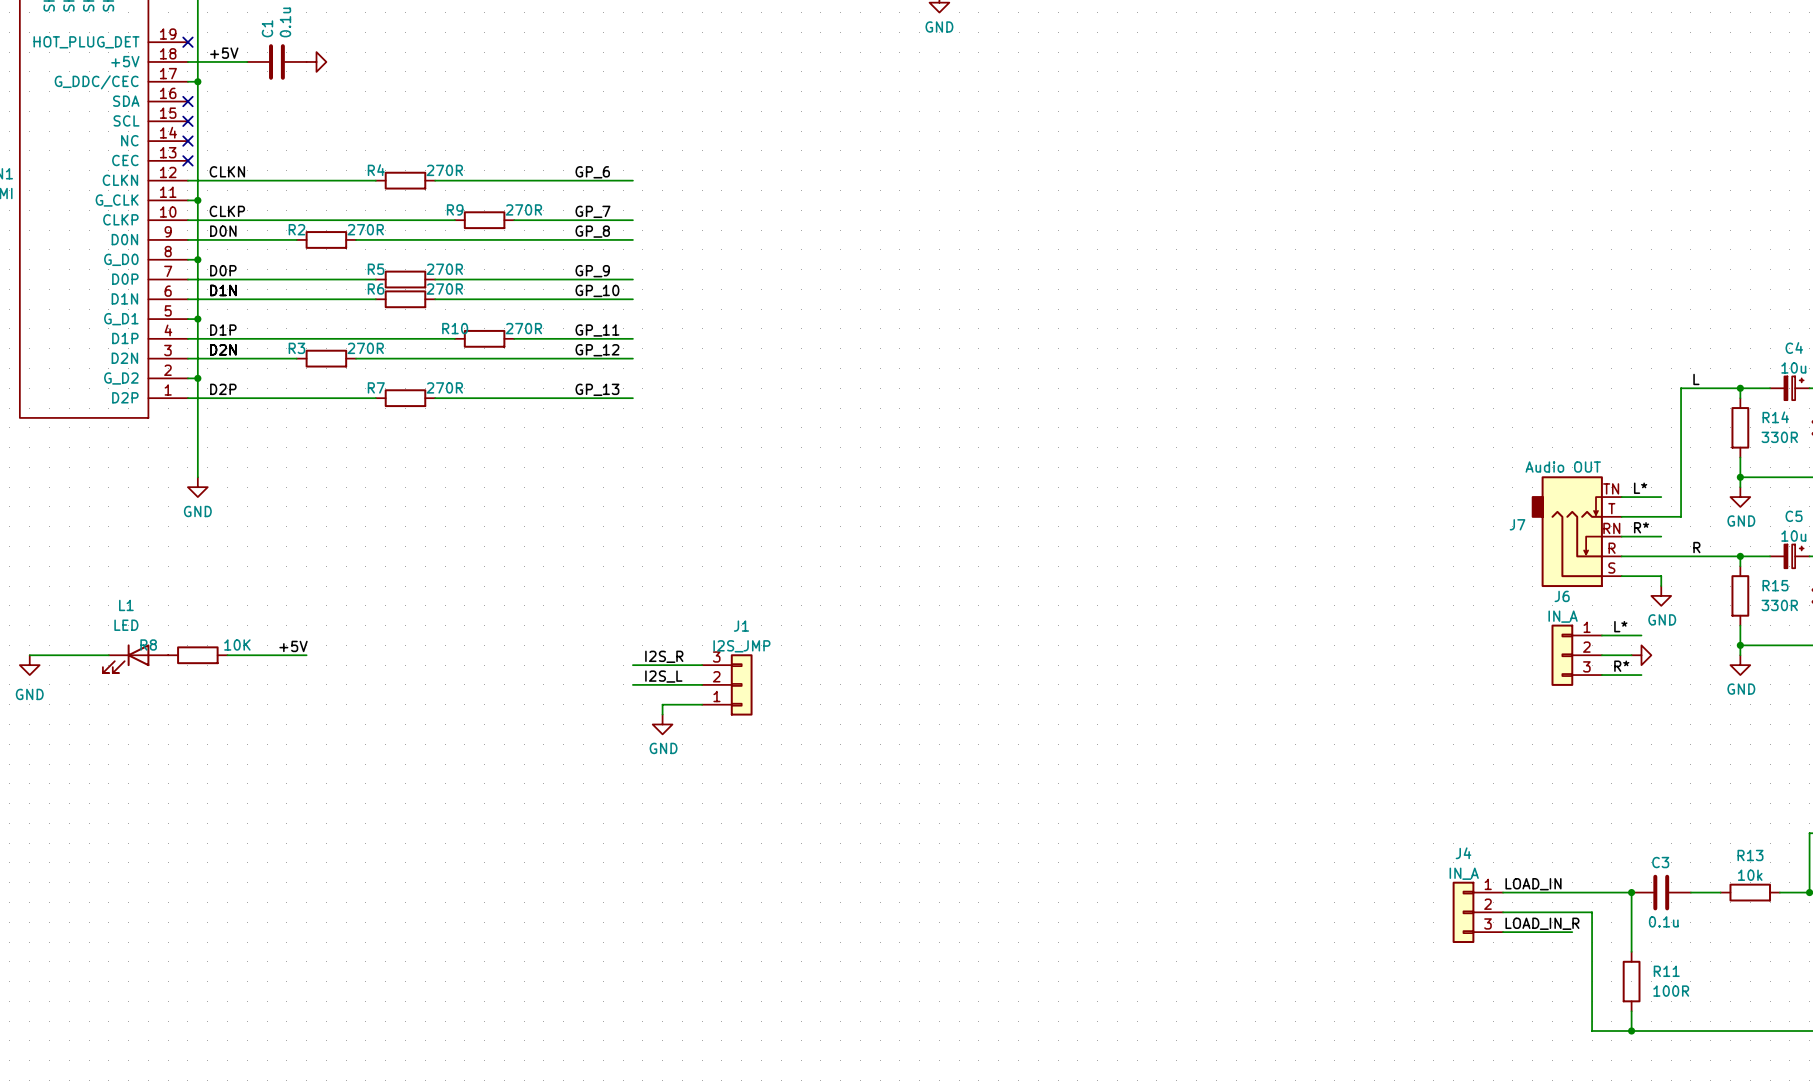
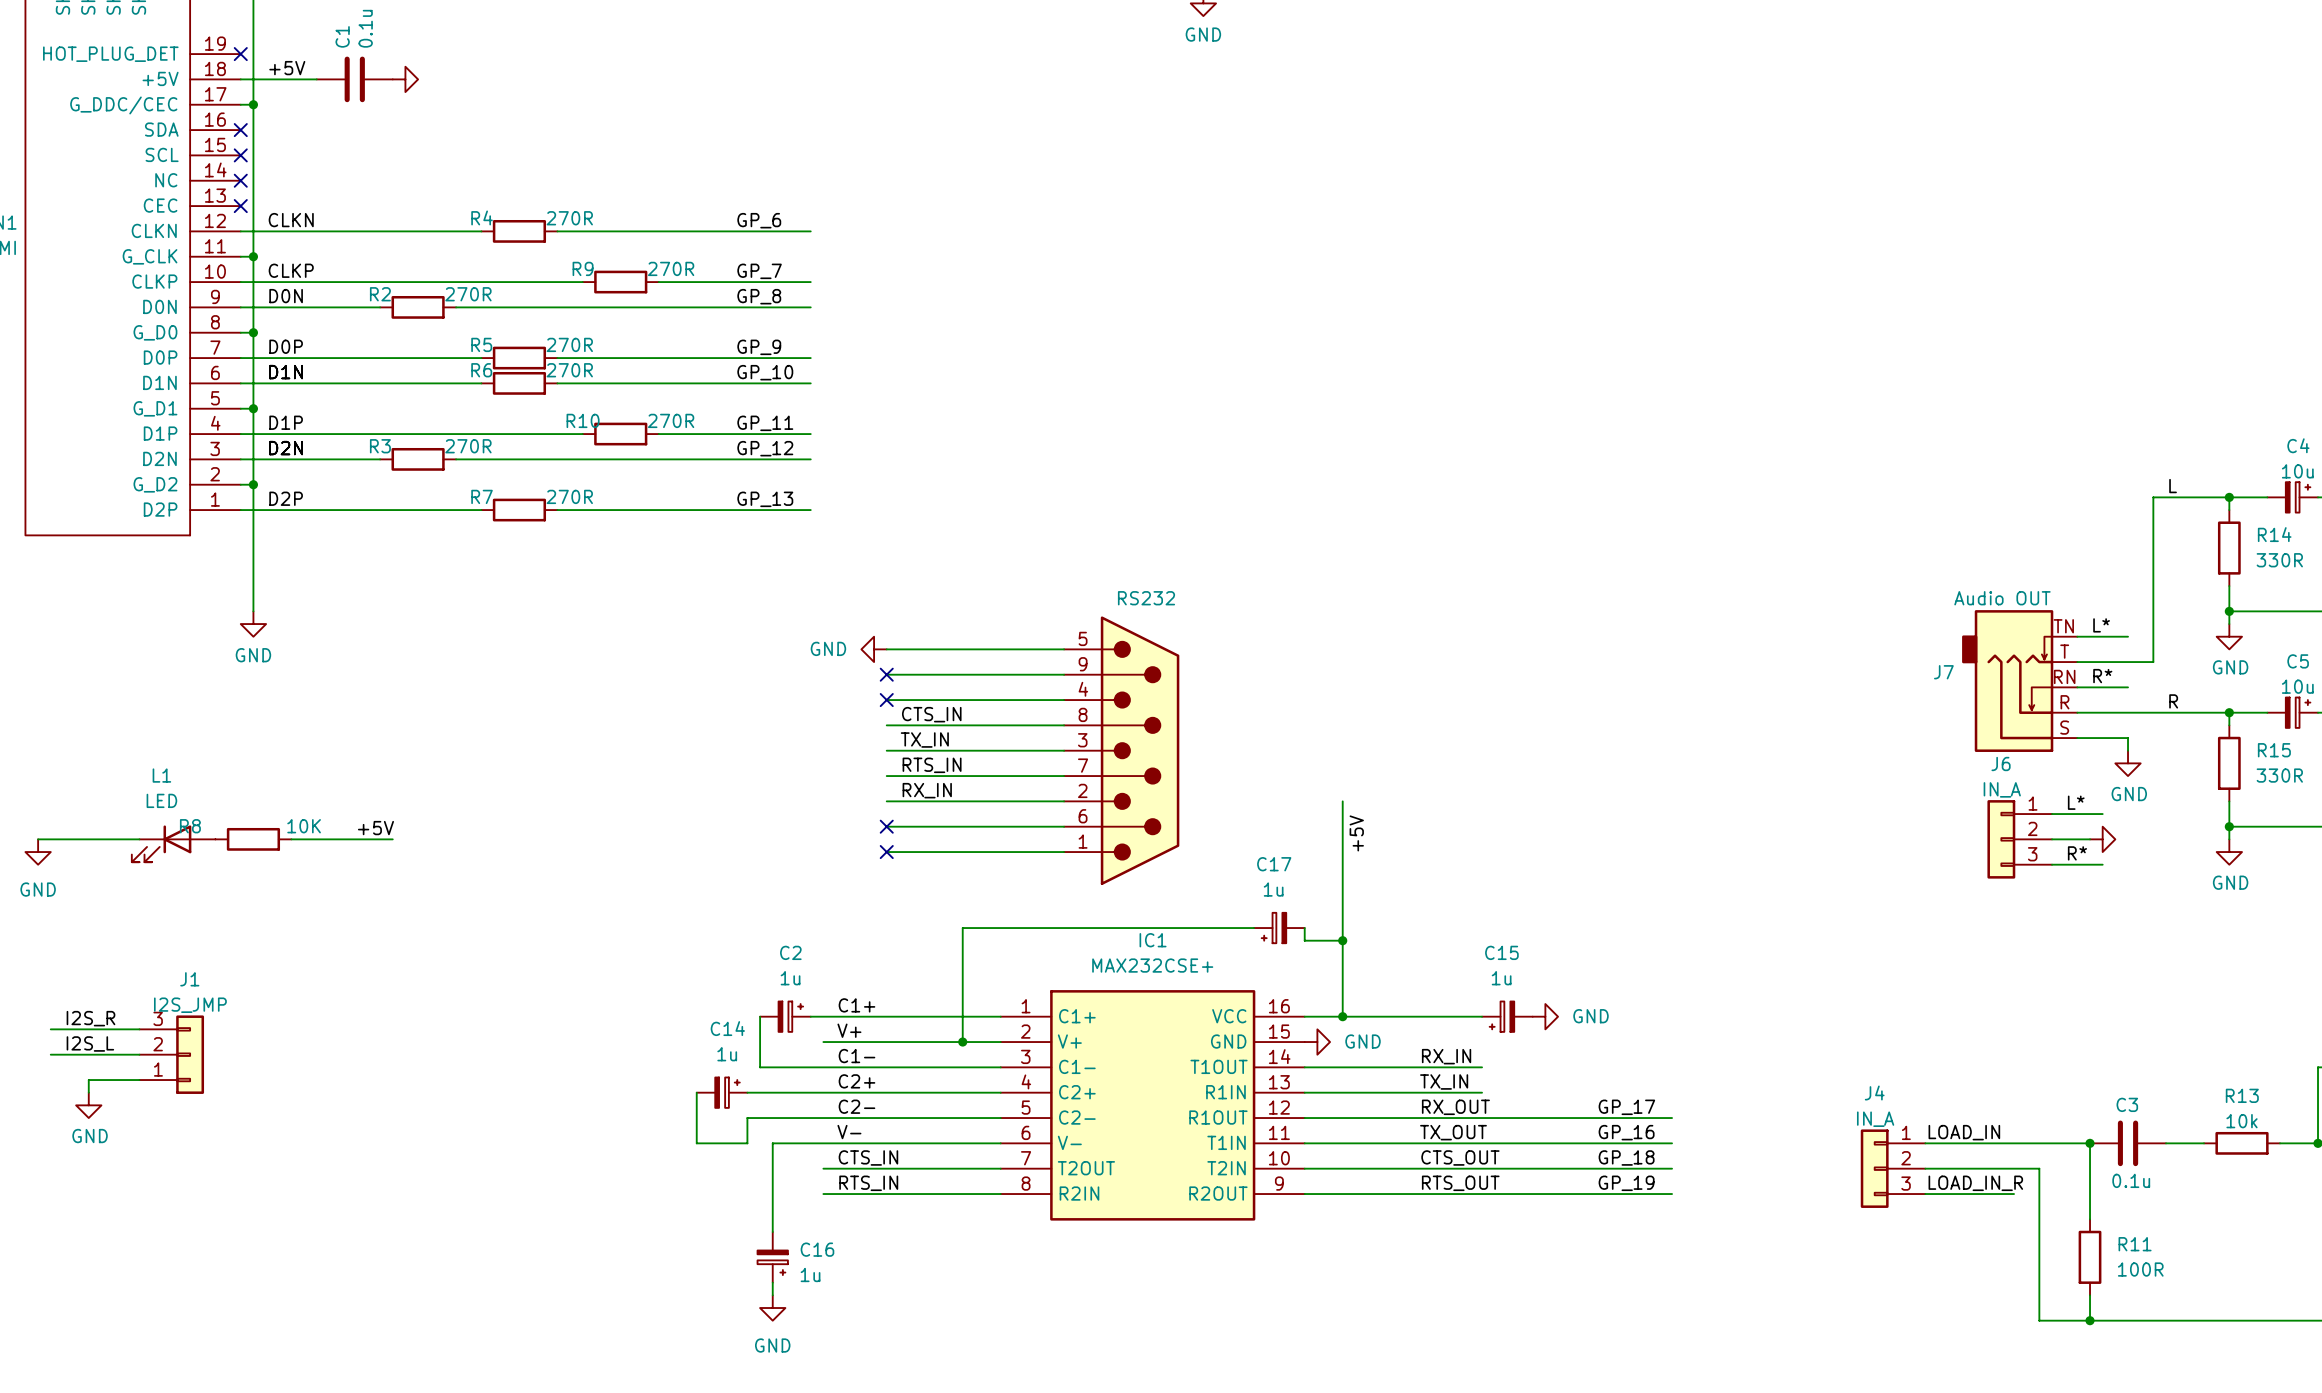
power symbol: none -> GND (874, 649)
wire: none -> (886, 649) (1064, 649)
wire: none -> (886, 674) (1064, 674)
no-connect mark: none -> (886, 674)
wire: none -> (886, 700) (1064, 700)
no-connect mark: none -> (886, 700)
label: none -> CTS_IN (931, 714)
wire: none -> (886, 725) (1064, 725)
label: none -> TX_IN (924, 740)
wire: none -> (886, 750) (1064, 750)
part: none -> RS232 (1121, 750)
label: none -> RTS_IN (932, 765)
wire: none -> (886, 776) (1064, 776)
label: none -> RX_IN (927, 790)
wire: none -> (886, 801) (1064, 801)
wire: none -> (1342, 801) (1342, 1016)
wire: none -> (886, 826) (1064, 826)
no-connect mark: none -> (886, 826)
label: none -> +5V (1356, 833)
label: I2S_R (664, 656) -> none
wire: (632, 665) (692, 665) -> none
no-connect mark: none -> (886, 852)
wire: none -> (899, 852) (1064, 852)
label: I2S_L (663, 676) -> none
wire: (632, 684) (702, 684) -> none
J1 position: (727, 684) -> (171, 1054)
wire: (702, 704) (662, 704) (662, 714) -> none
power symbol: GND (662, 724) -> none
wire: none -> (1254, 928) (962, 928) (962, 1042)
C17: none -> 1u (1279, 928)
wire: none -> (1304, 928) (1304, 940) (1342, 940)
junction: none -> (1342, 940)
label: none -> C1+ (856, 1005)
wire: none -> (760, 1016) (760, 1067) (1000, 1067)
C2: none -> 1u (785, 1016)
wire: none -> (810, 1016) (1000, 1016)
wire: none -> (1304, 1016) (1482, 1016)
junction: none -> (1342, 1016)
C15: none -> 1u (1507, 1016)
power symbol: none -> GND (1545, 1016)
label: none -> I2S_R (90, 1018)
wire: none -> (50, 1029) (139, 1029)
label: none -> V+ (849, 1030)
wire: none -> (823, 1042) (1000, 1042)
junction: none -> (962, 1042)
power symbol: none -> GND (1317, 1042)
label: none -> I2S_L (90, 1043)
wire: none -> (50, 1054) (139, 1054)
label: none -> C1- (856, 1056)
label: none -> RX_IN (1446, 1056)
wire: none -> (1304, 1067) (1482, 1067)
wire: none -> (139, 1080) (88, 1080) (88, 1092)
label: none -> C2+ (856, 1081)
label: none -> TX_IN (1444, 1081)
wire: none -> (696, 1092) (696, 1143) (747, 1143) (747, 1118) (1000, 1118)
C14: none -> 1u (722, 1092)
wire: none -> (747, 1092) (1000, 1092)
wire: none -> (1304, 1092) (1482, 1092)
power symbol: none -> GND (88, 1105)
IC1: none -> MAX232CSE+ (1152, 1105)
label: none -> C2- (856, 1106)
label: none -> RX_OUT (1455, 1107)
label: none -> GP_17 (1626, 1107)
wire: none -> (1304, 1118) (1672, 1118)
label: none -> V- (849, 1132)
label: none -> TX_OUT (1453, 1132)
label: none -> GP_16 (1626, 1132)
wire: none -> (1000, 1143) (772, 1143) (772, 1232)
wire: none -> (1304, 1143) (1672, 1143)
label: none -> CTS_IN (868, 1157)
label: none -> CTS_OUT (1460, 1157)
label: none -> GP_18 (1626, 1157)
wire: none -> (823, 1168) (1000, 1168)
wire: none -> (1304, 1168) (1672, 1168)
label: none -> RTS_IN (868, 1183)
label: none -> RTS_OUT (1460, 1183)
label: none -> GP_19 (1626, 1183)
wire: none -> (823, 1194) (1000, 1194)
wire: none -> (1304, 1194) (1672, 1194)
C16: none -> 1u (772, 1257)
wire: none -> (772, 1282) (772, 1295)
power symbol: none -> GND (772, 1308)

